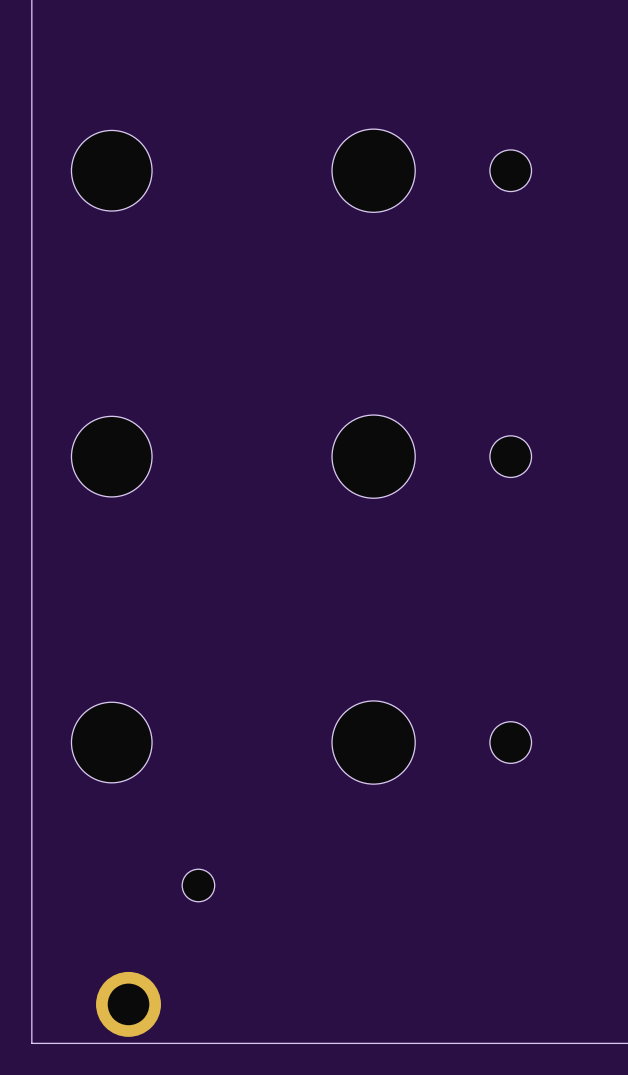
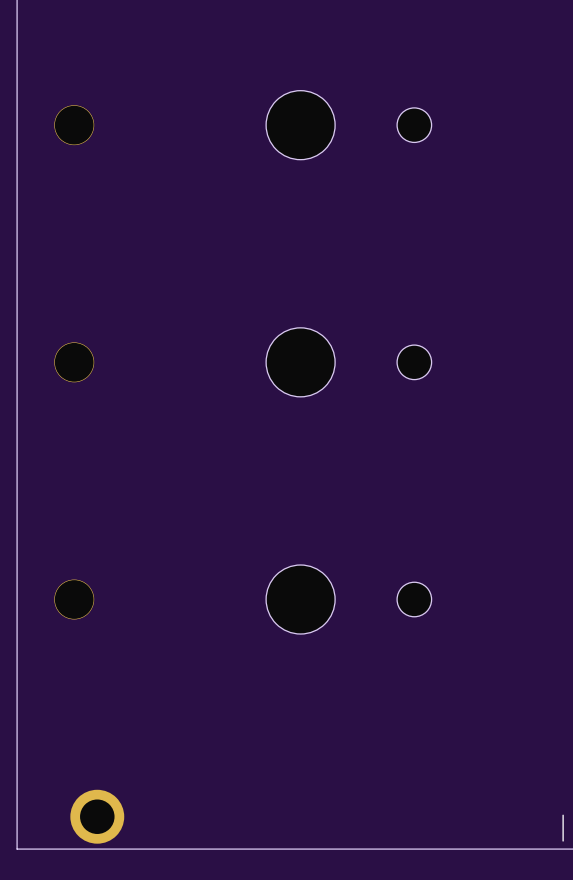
part footprint: [71, 130, 153, 212] -> [54, 105, 95, 146]
part footprint: [71, 416, 153, 497] -> [54, 342, 95, 383]
part footprint: [71, 702, 153, 783] -> [54, 579, 95, 620]
part: (198, 885) -> none

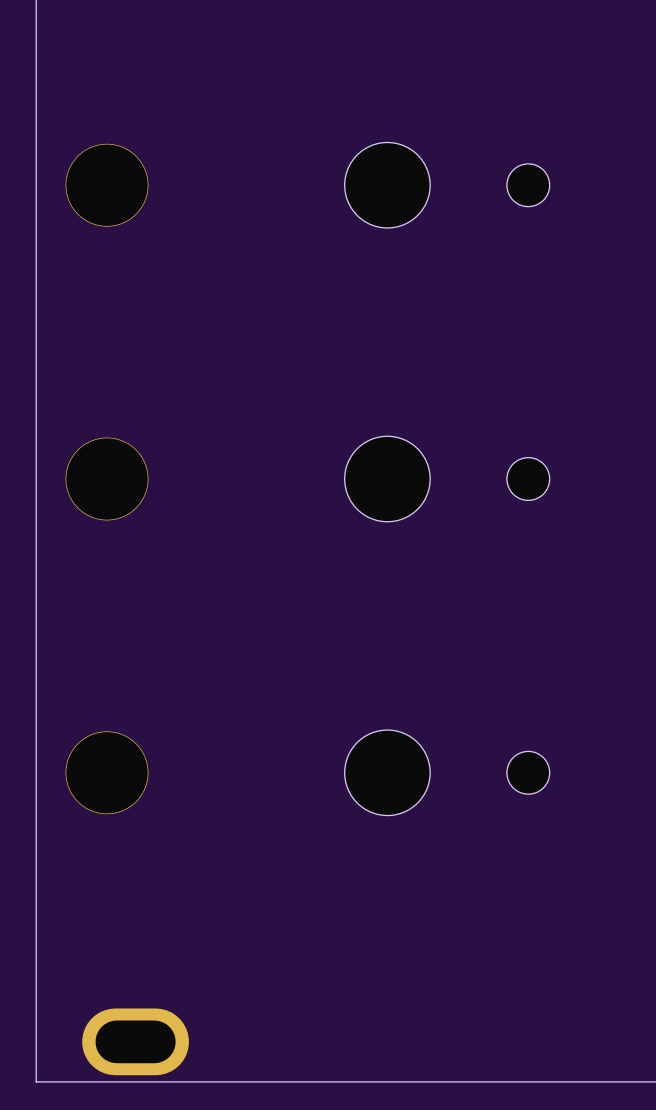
part footprint: [54, 105, 95, 146] -> [65, 143, 149, 227]
part footprint: [54, 342, 95, 383] -> [65, 437, 149, 521]
part footprint: [54, 579, 95, 620] -> [65, 731, 149, 815]
part footprint: [70, 789, 125, 844] -> [82, 1008, 189, 1076]

